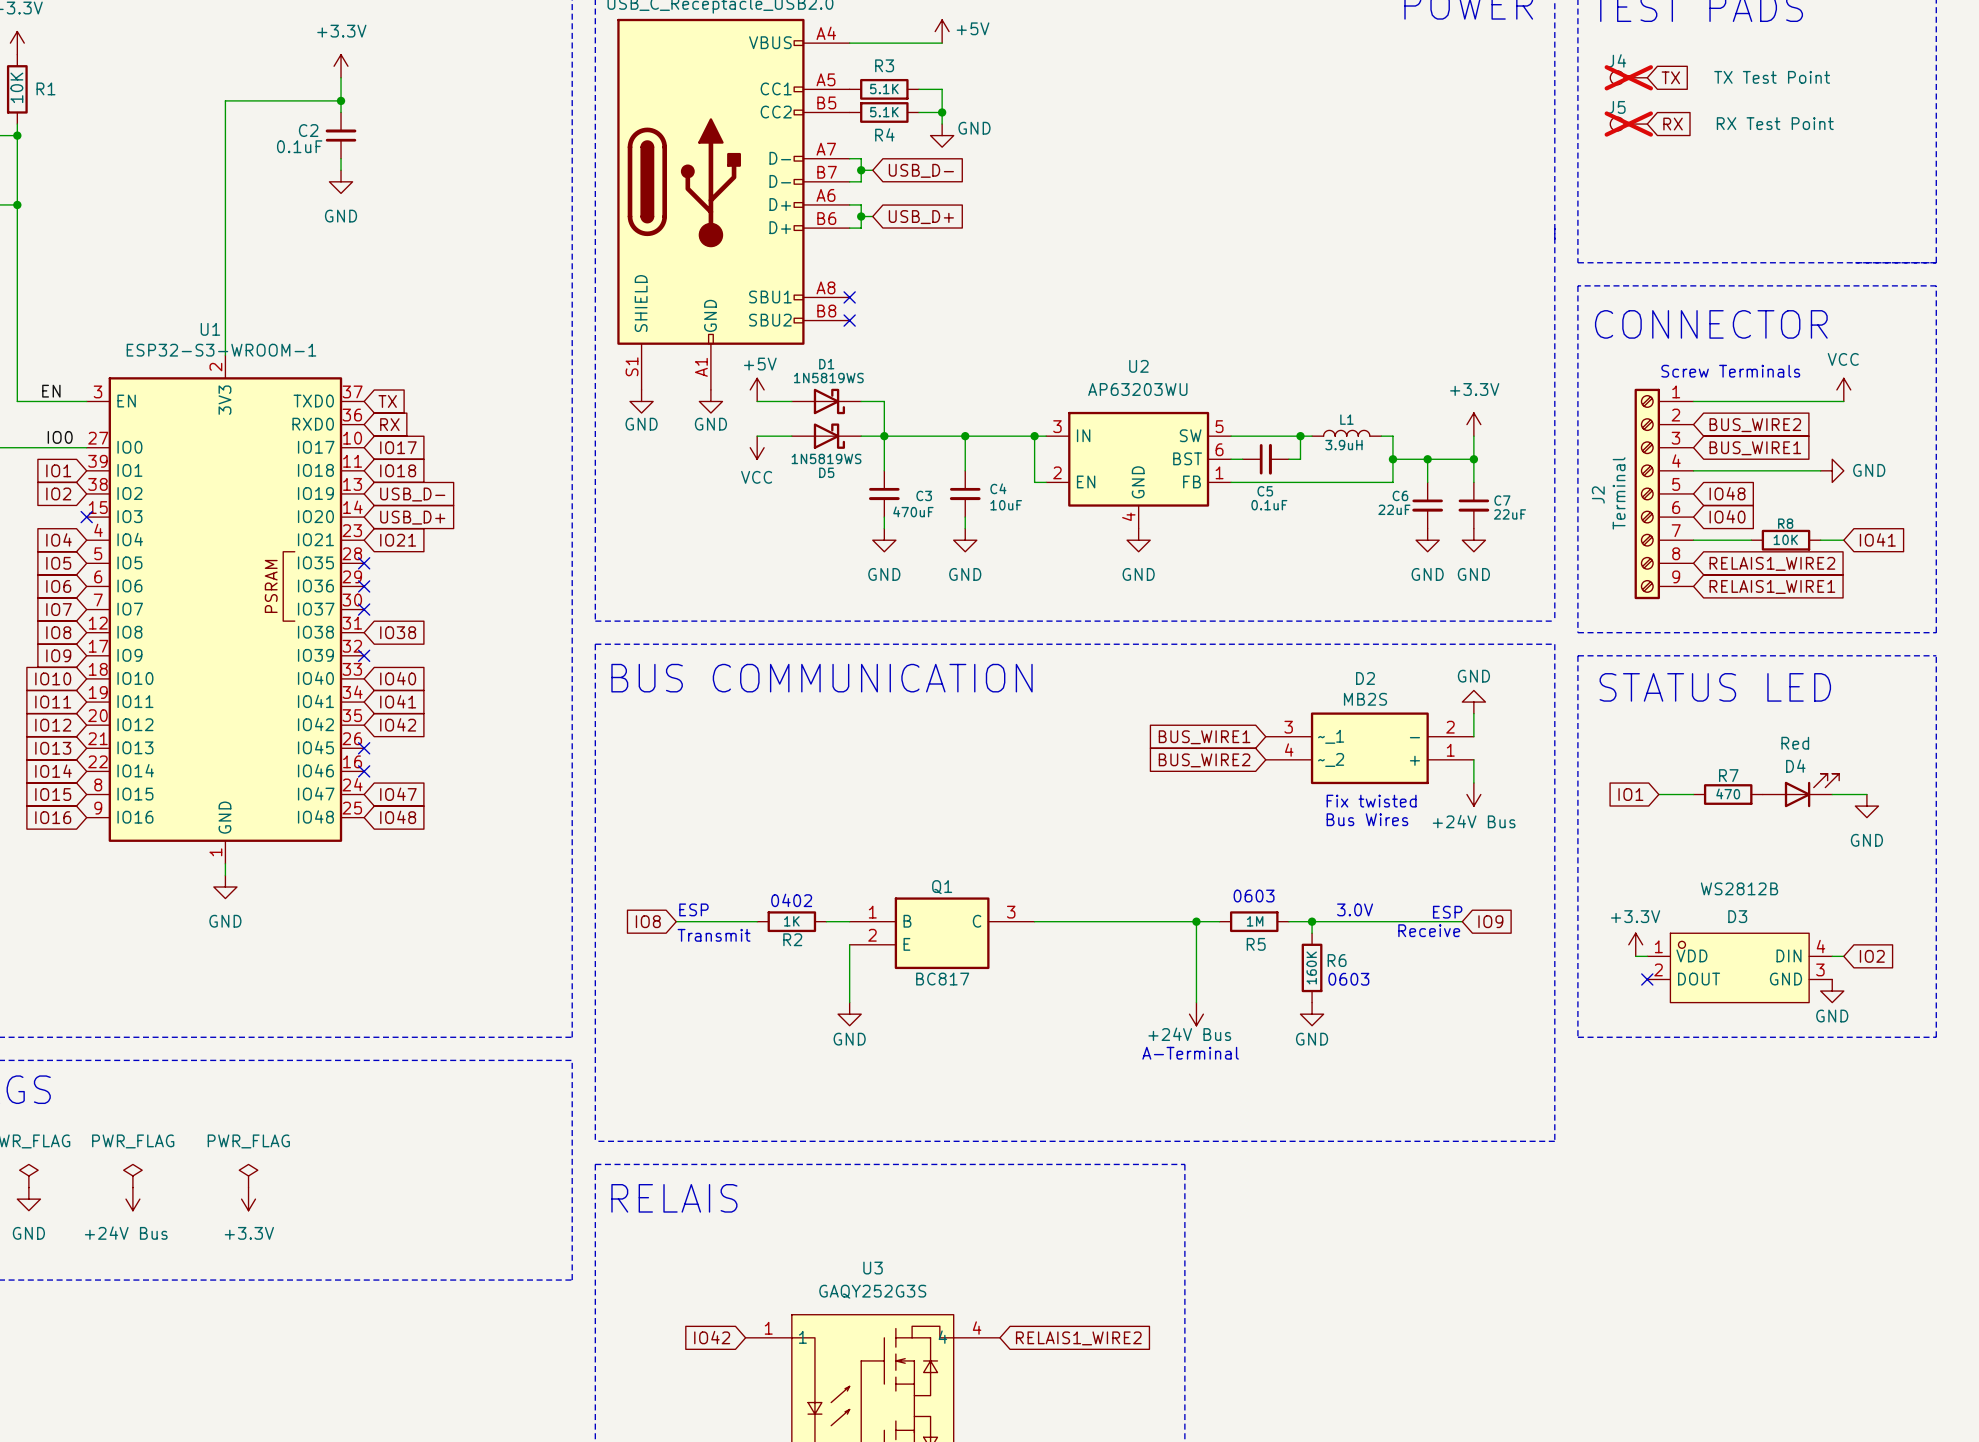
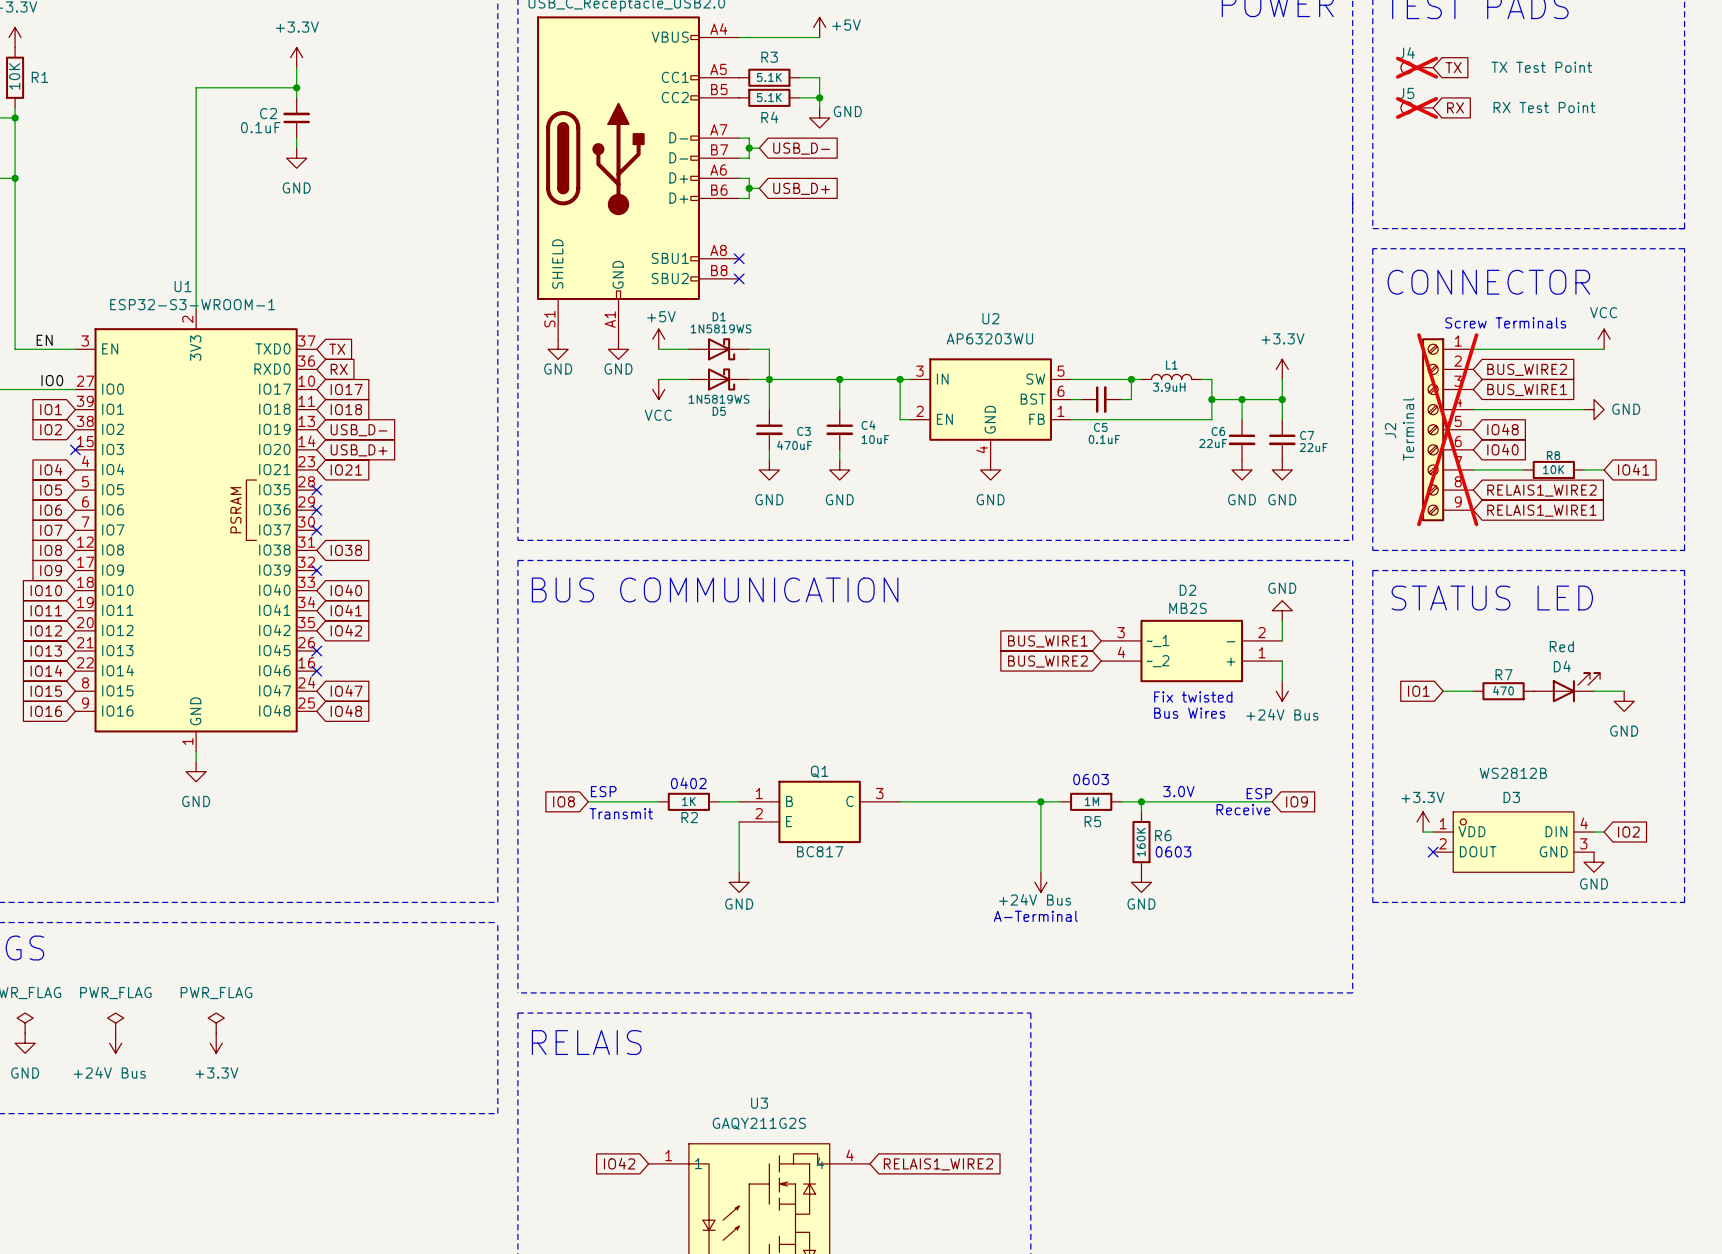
J2 do-not-place cross: none -> (1447, 429)
U3 value: GAQY252G3S (872, 1291) -> GAQY211G2S (759, 1123)

